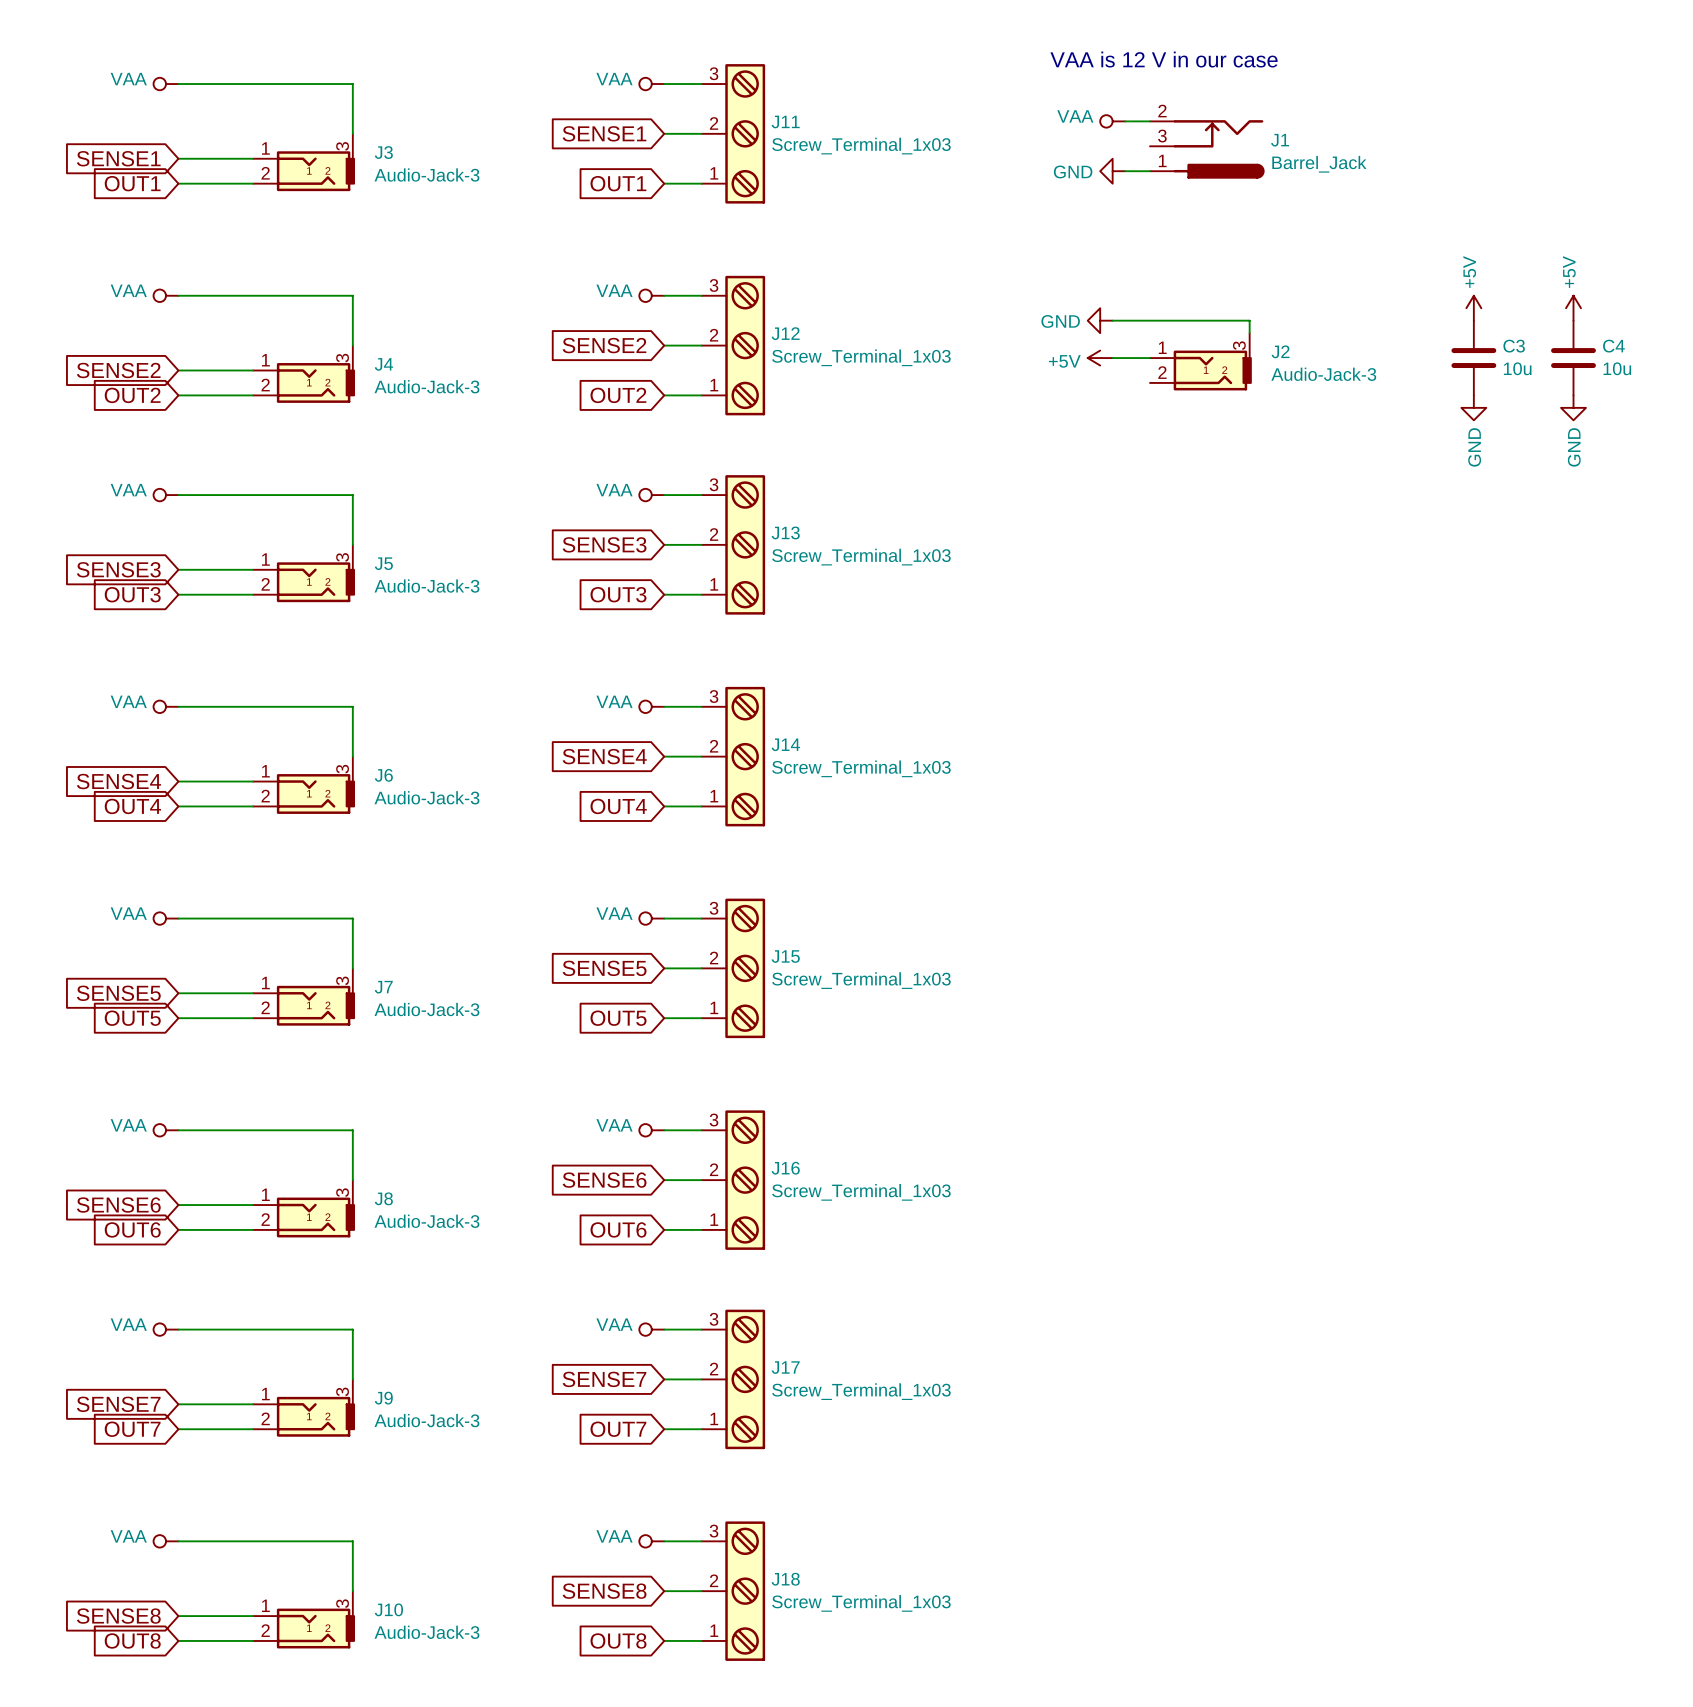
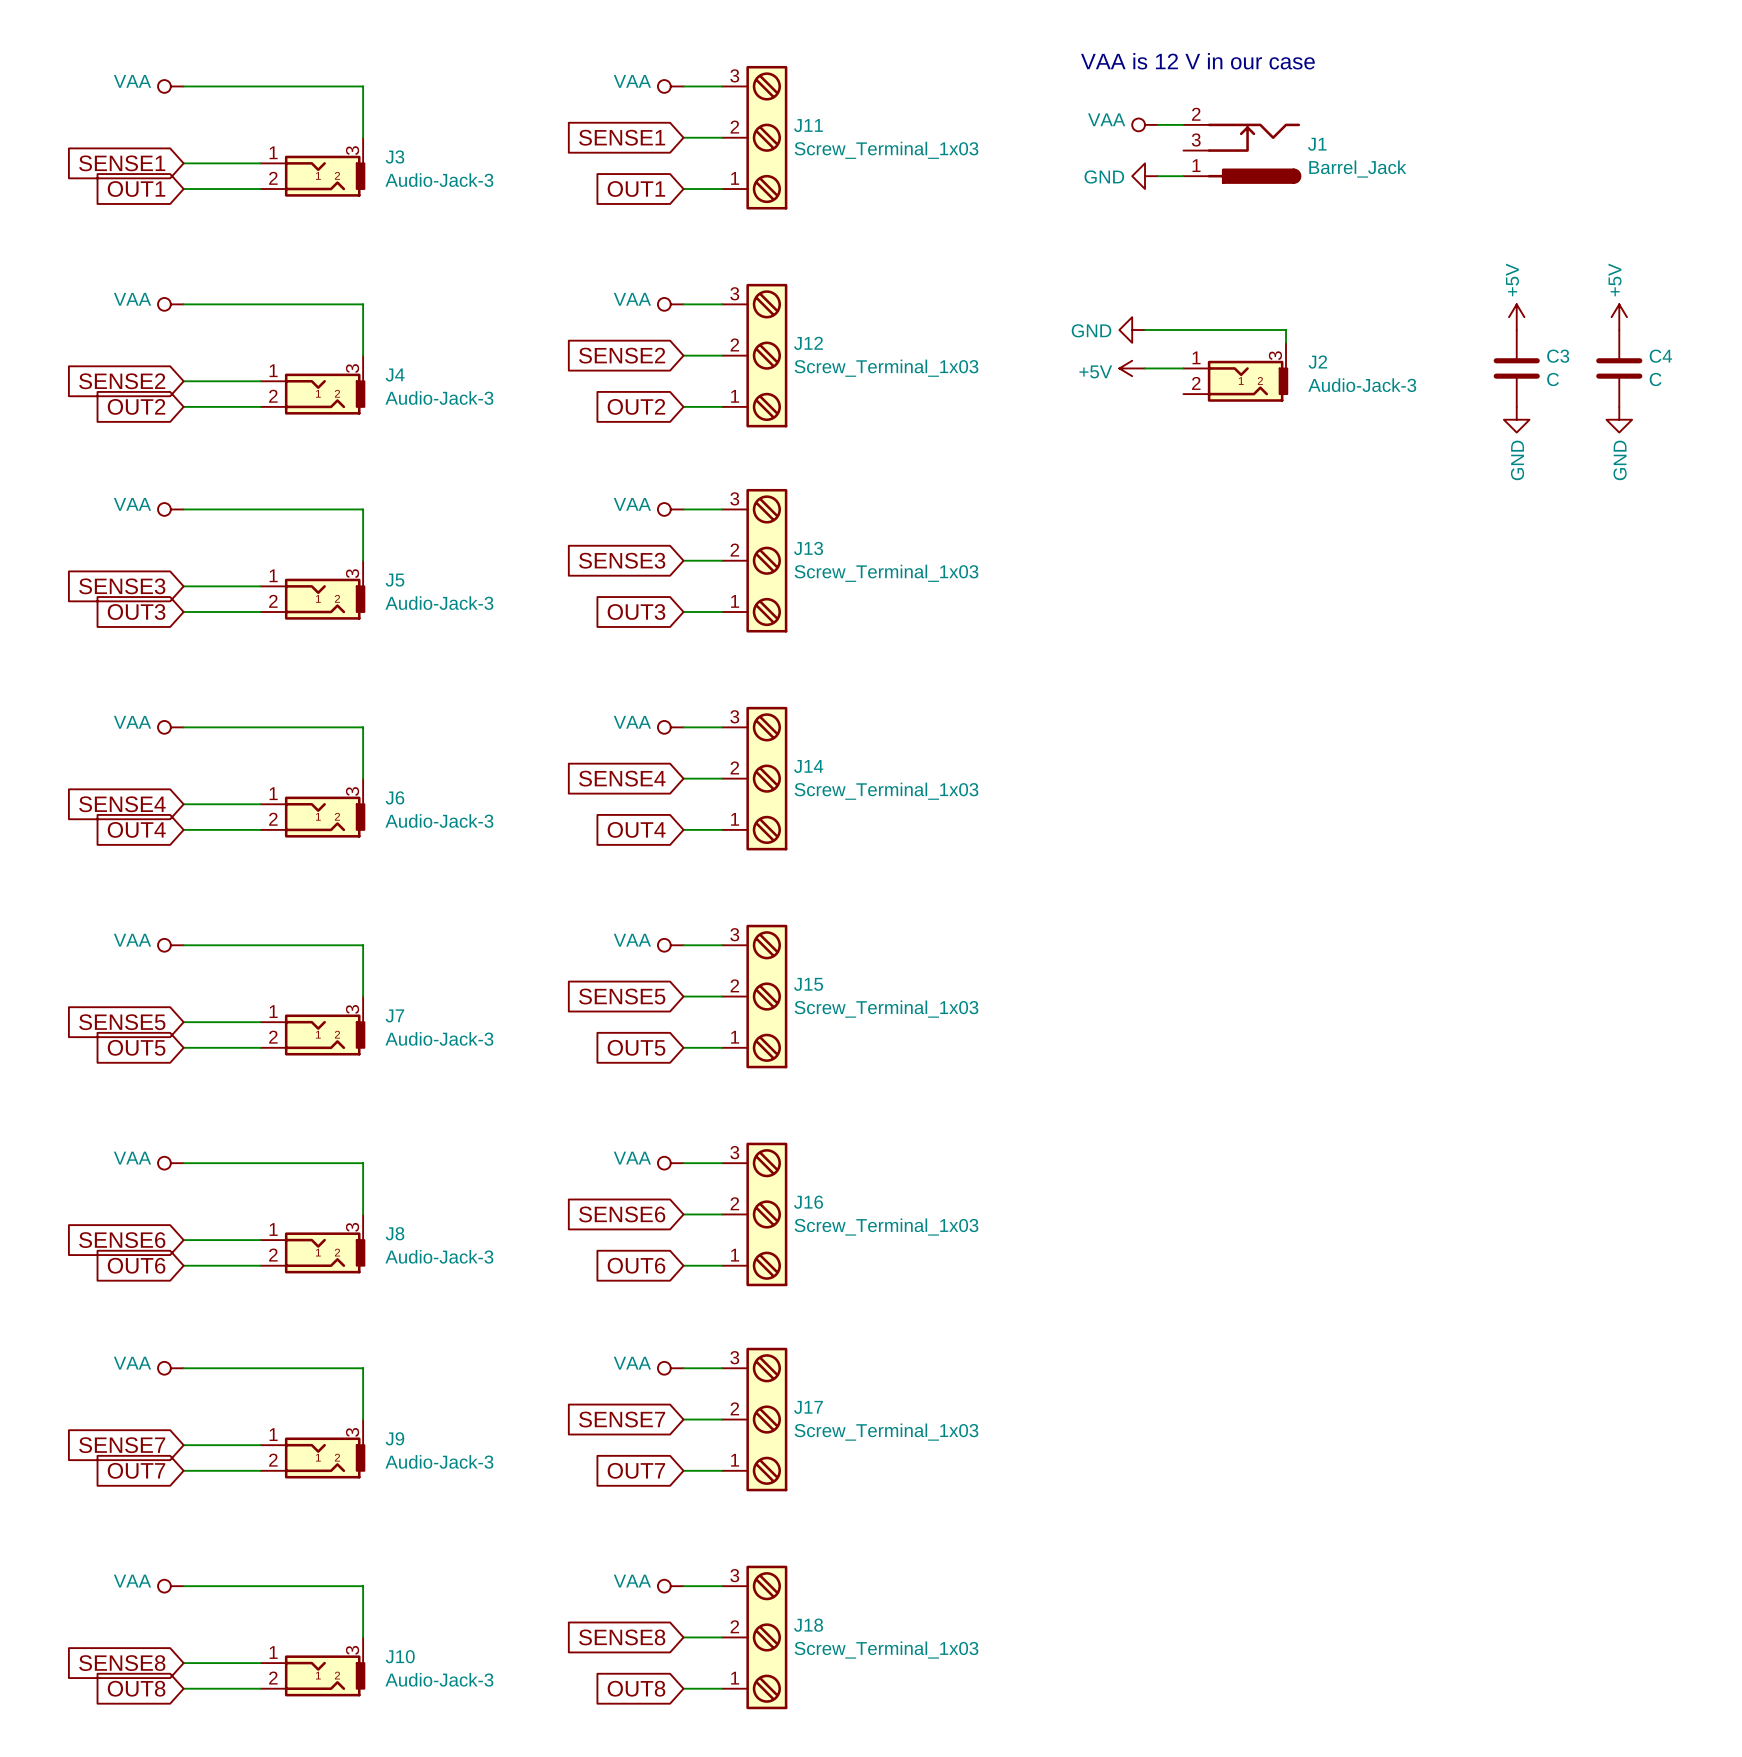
C3 value: 10u (1517, 368) -> C (1553, 379)
C4 value: 10u (1617, 368) -> C (1655, 379)

